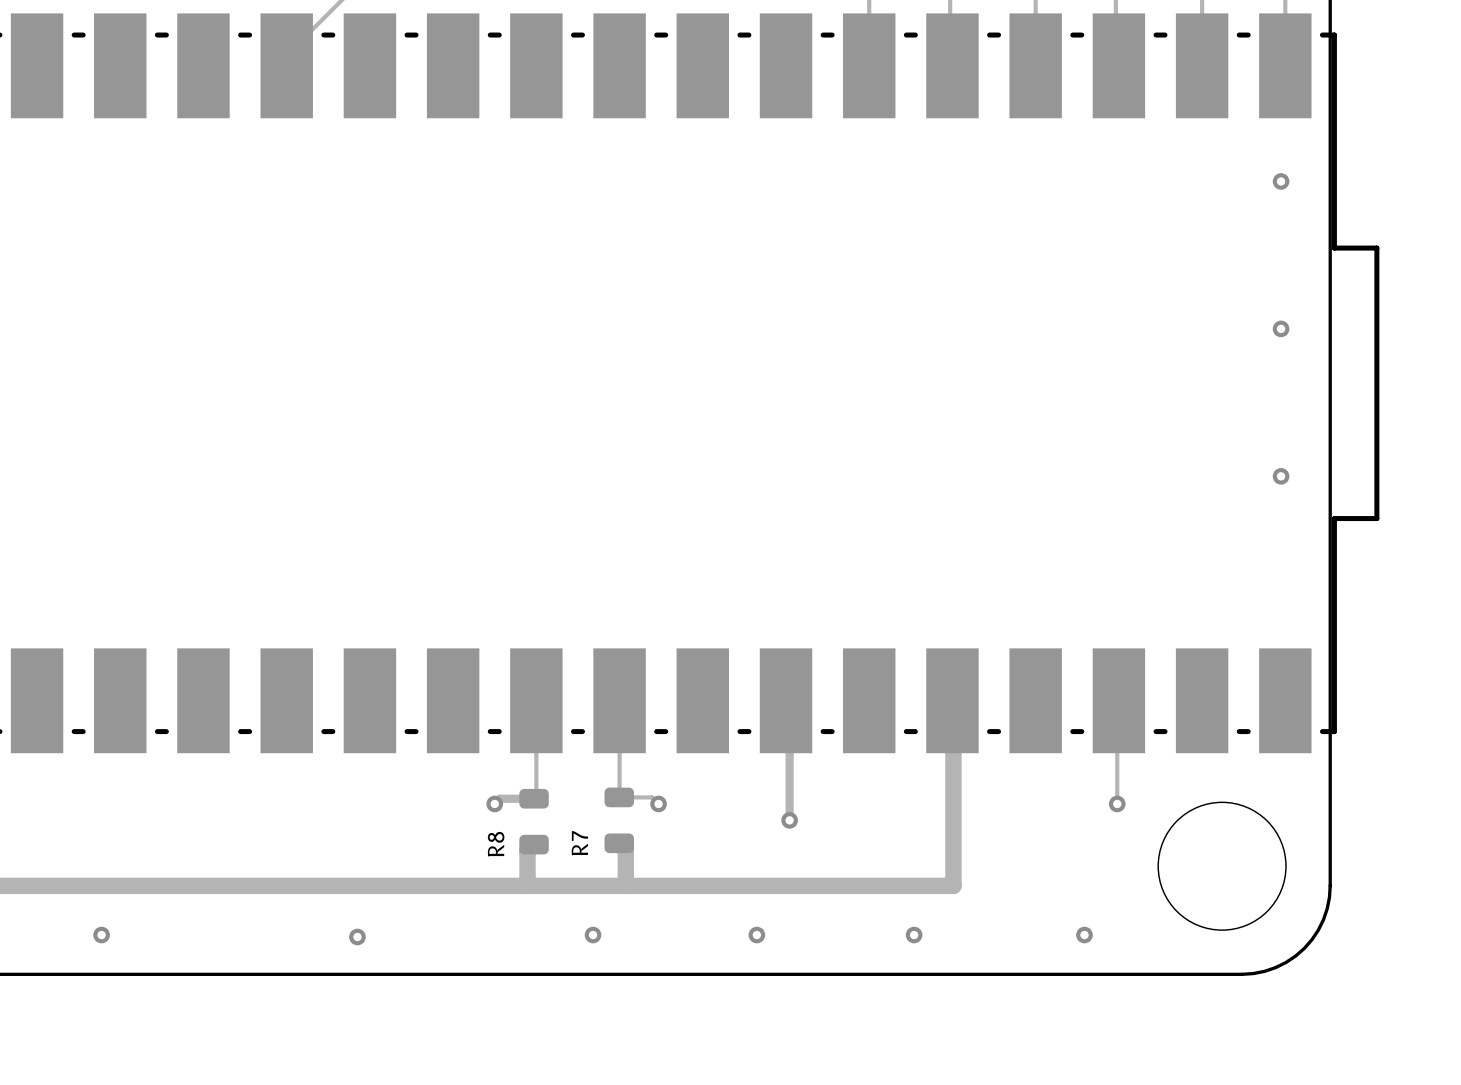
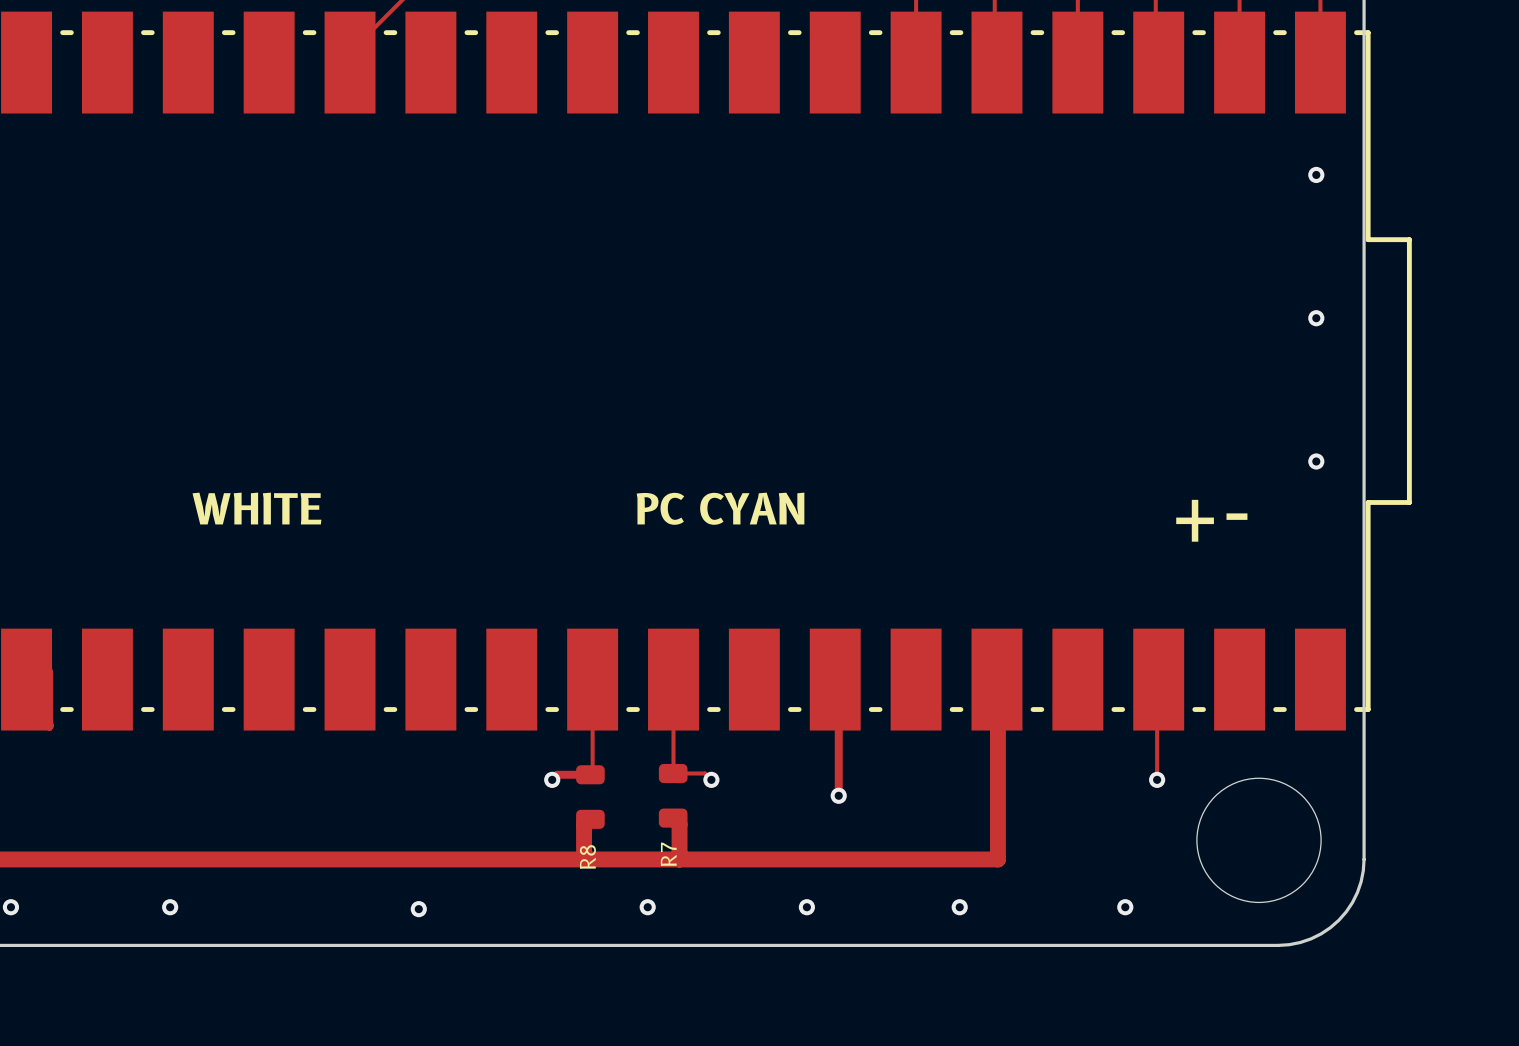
text: none -> WHITE (256, 508)
text: none -> PC CYAN (720, 508)
text: none -> -+ (1211, 520)
R7 name position: R7 (579, 843) -> R7 (668, 854)
R8 name position: R8 (496, 844) -> R8 (587, 857)

